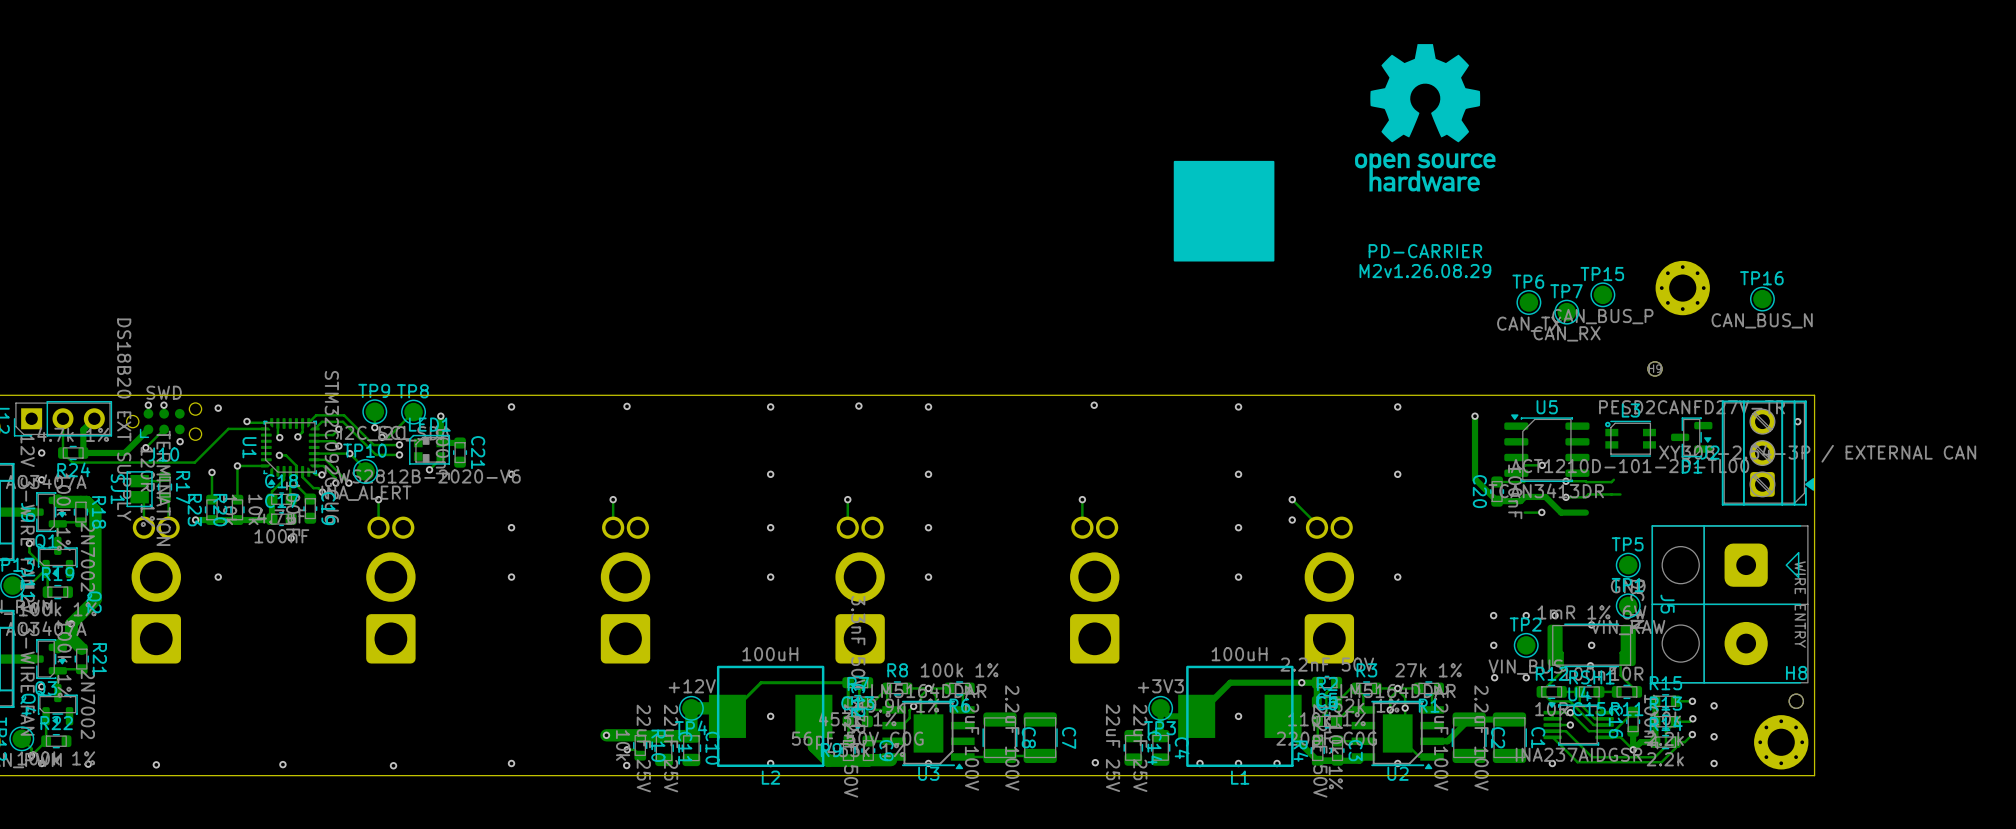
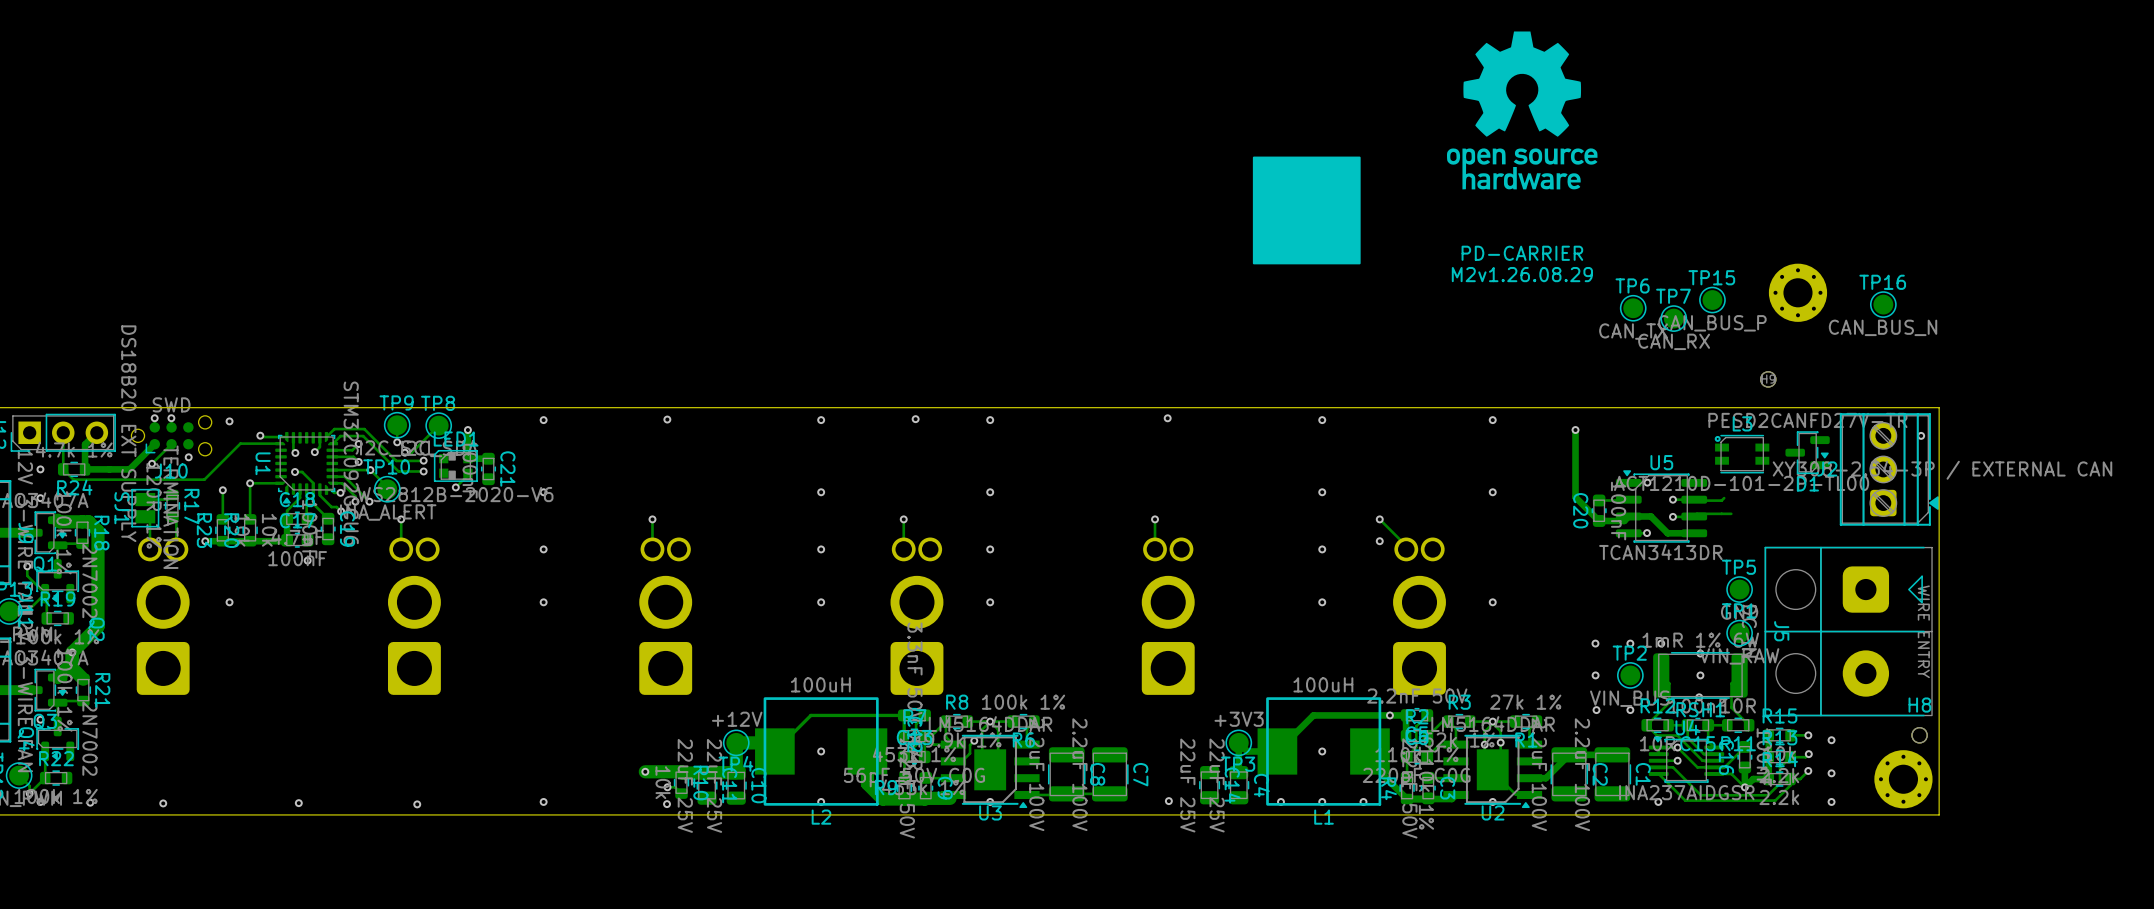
U5 position: (1546, 448) -> (1661, 506)

